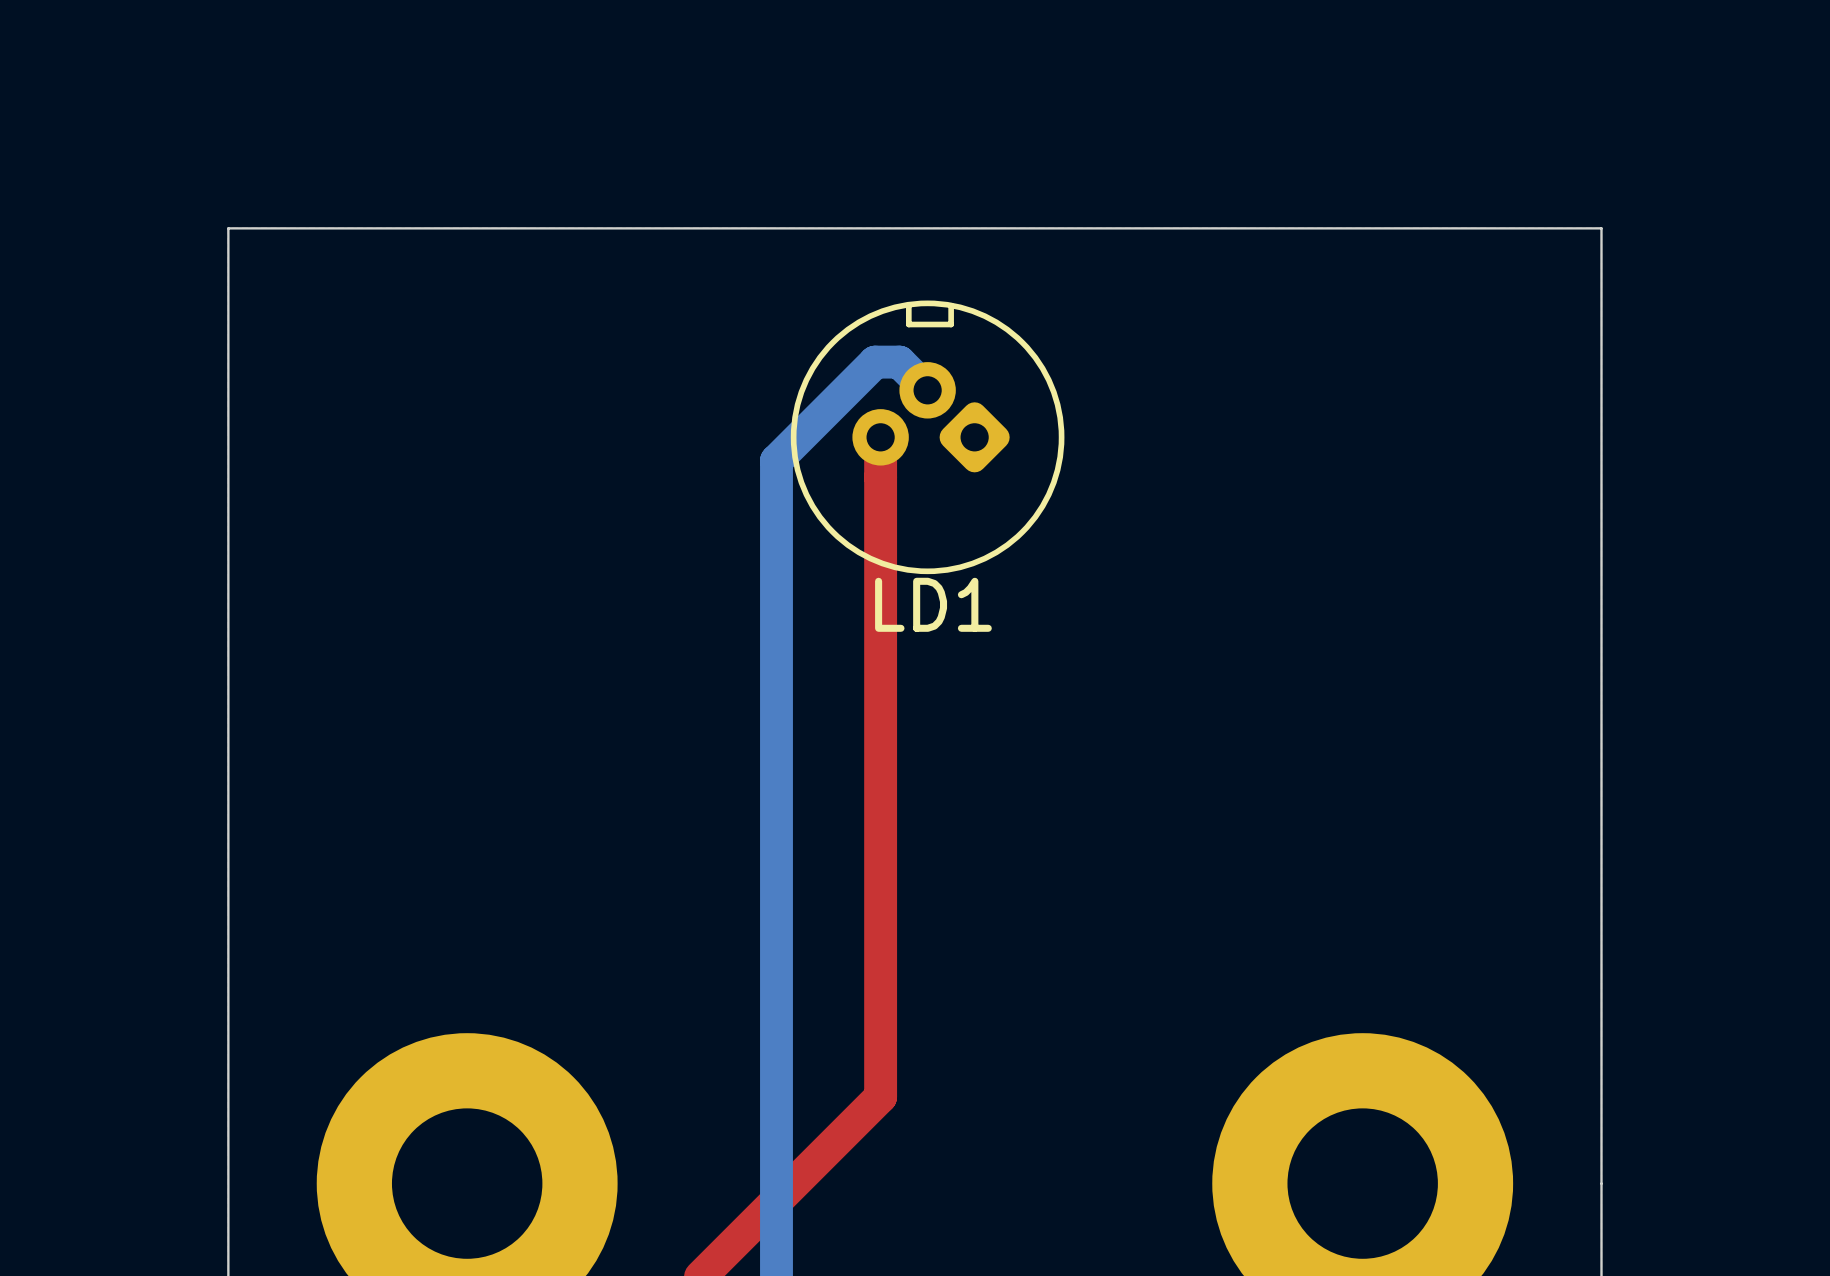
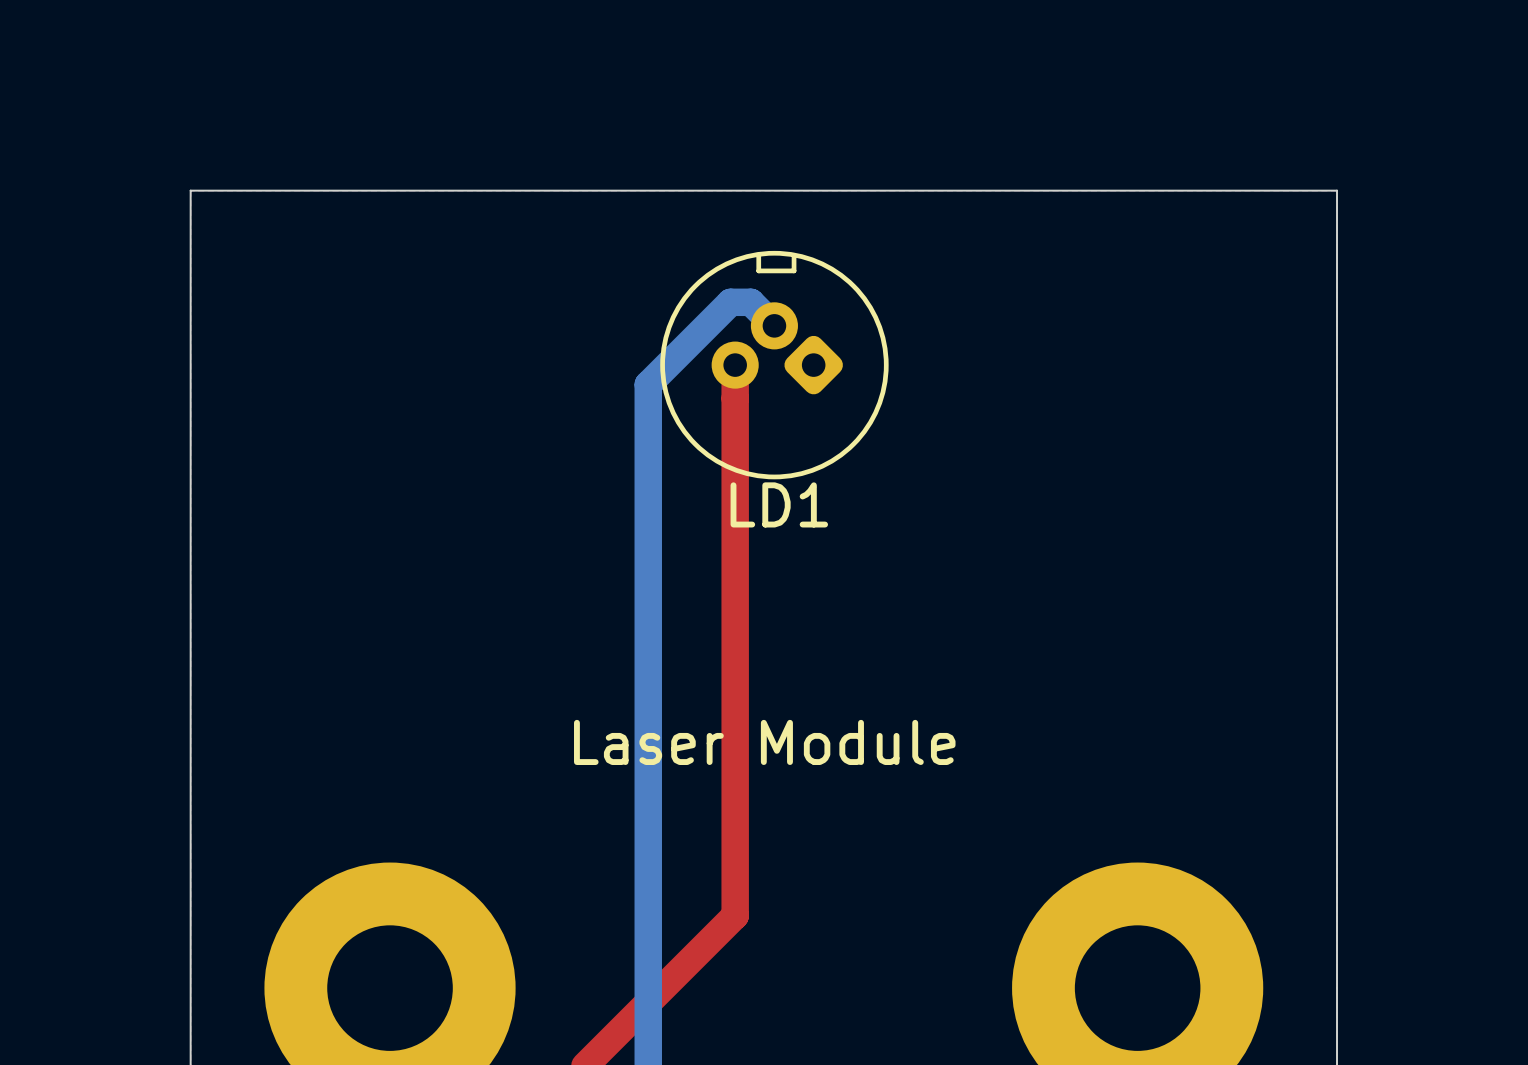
text: none -> Laser Module (764, 742)

